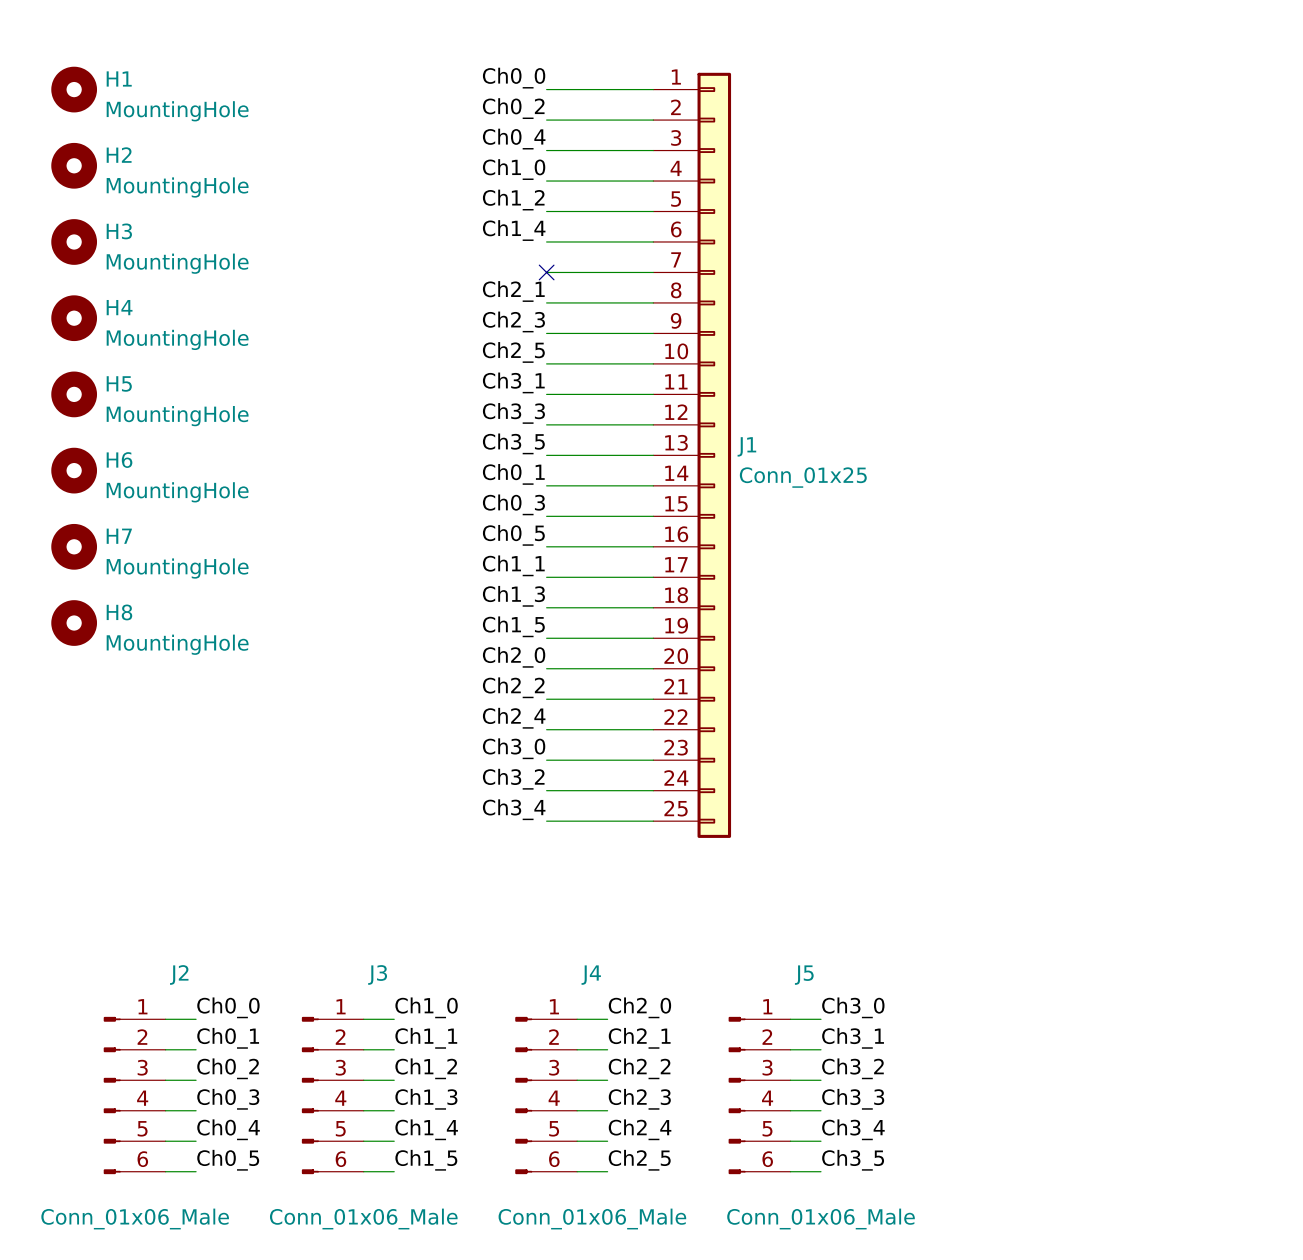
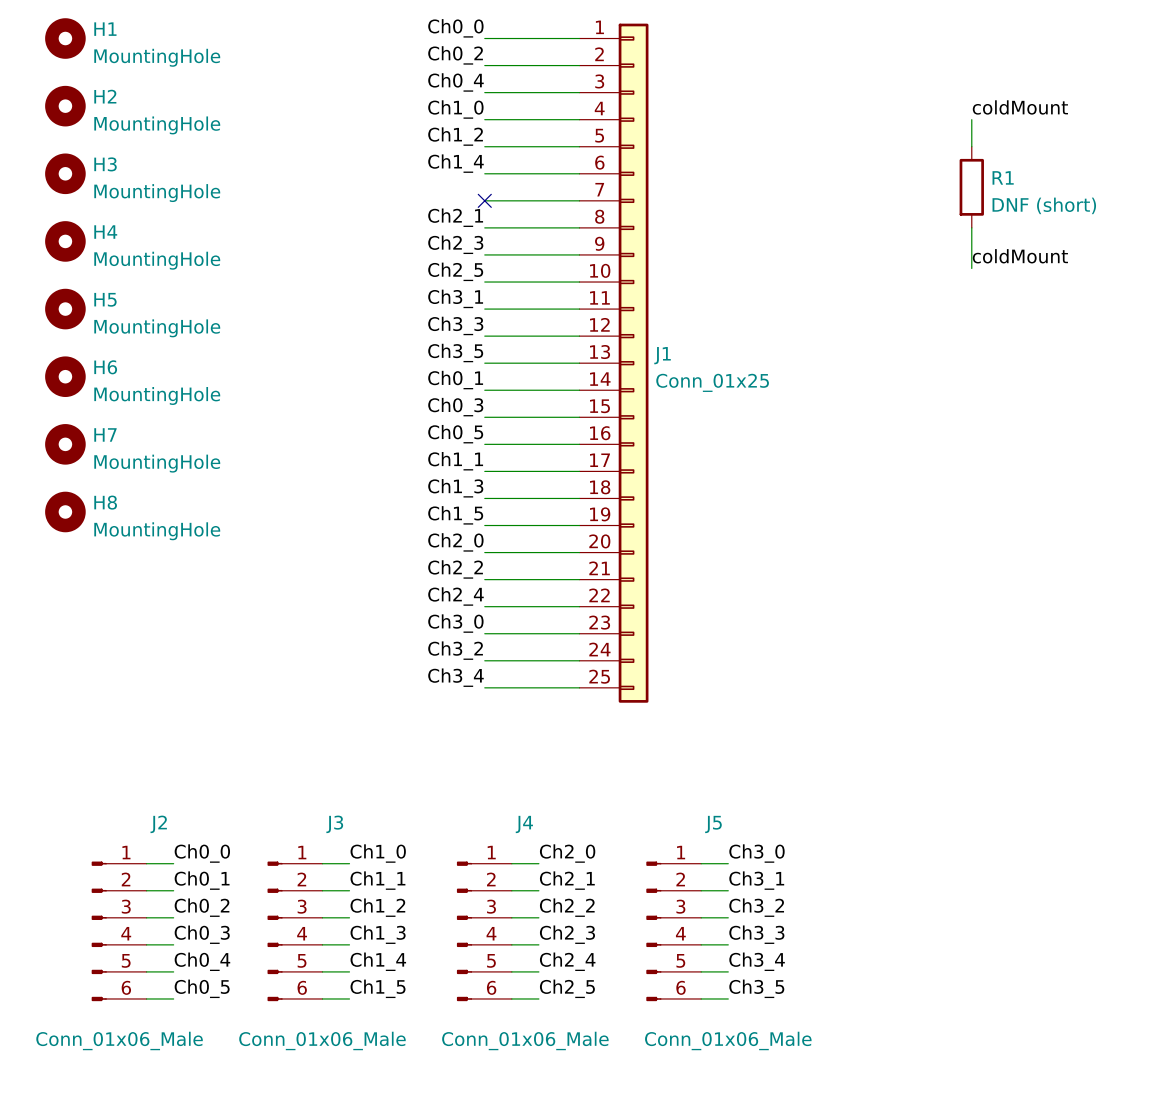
label: none -> coldMount (1020, 107)
wire: none -> (971, 119) (971, 146)
R1: none -> DNF (short) (971, 187)
wire: none -> (971, 227) (971, 268)
label: none -> coldMount (1020, 256)

